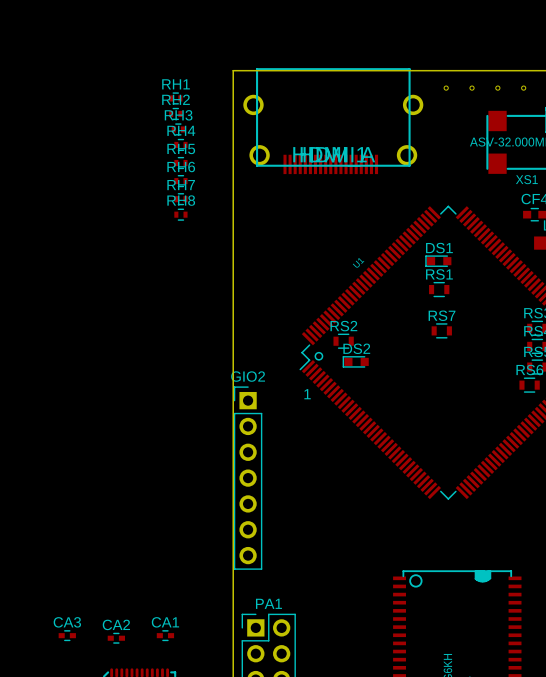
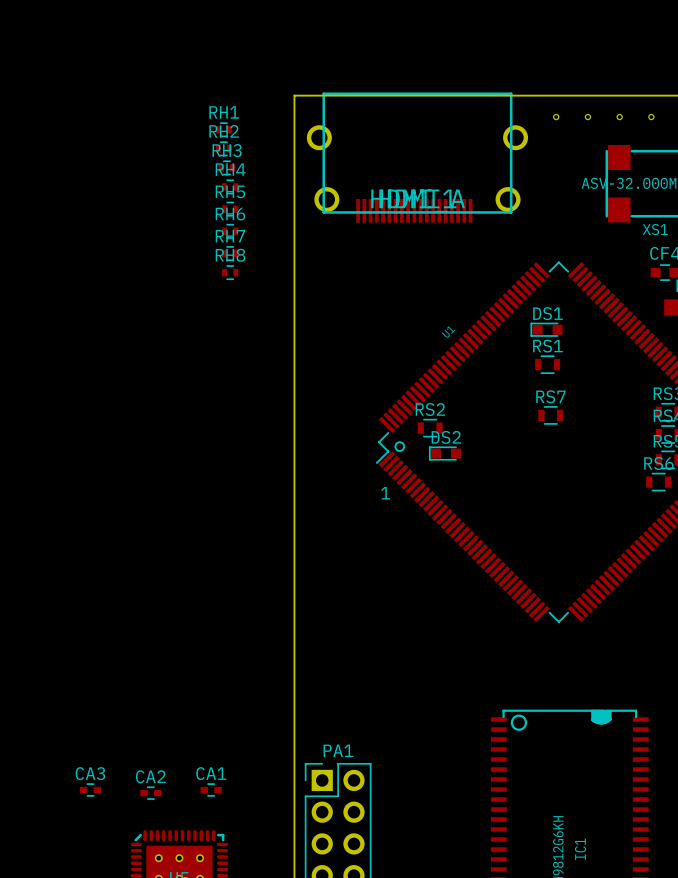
GIO2: (248, 478) -> none

